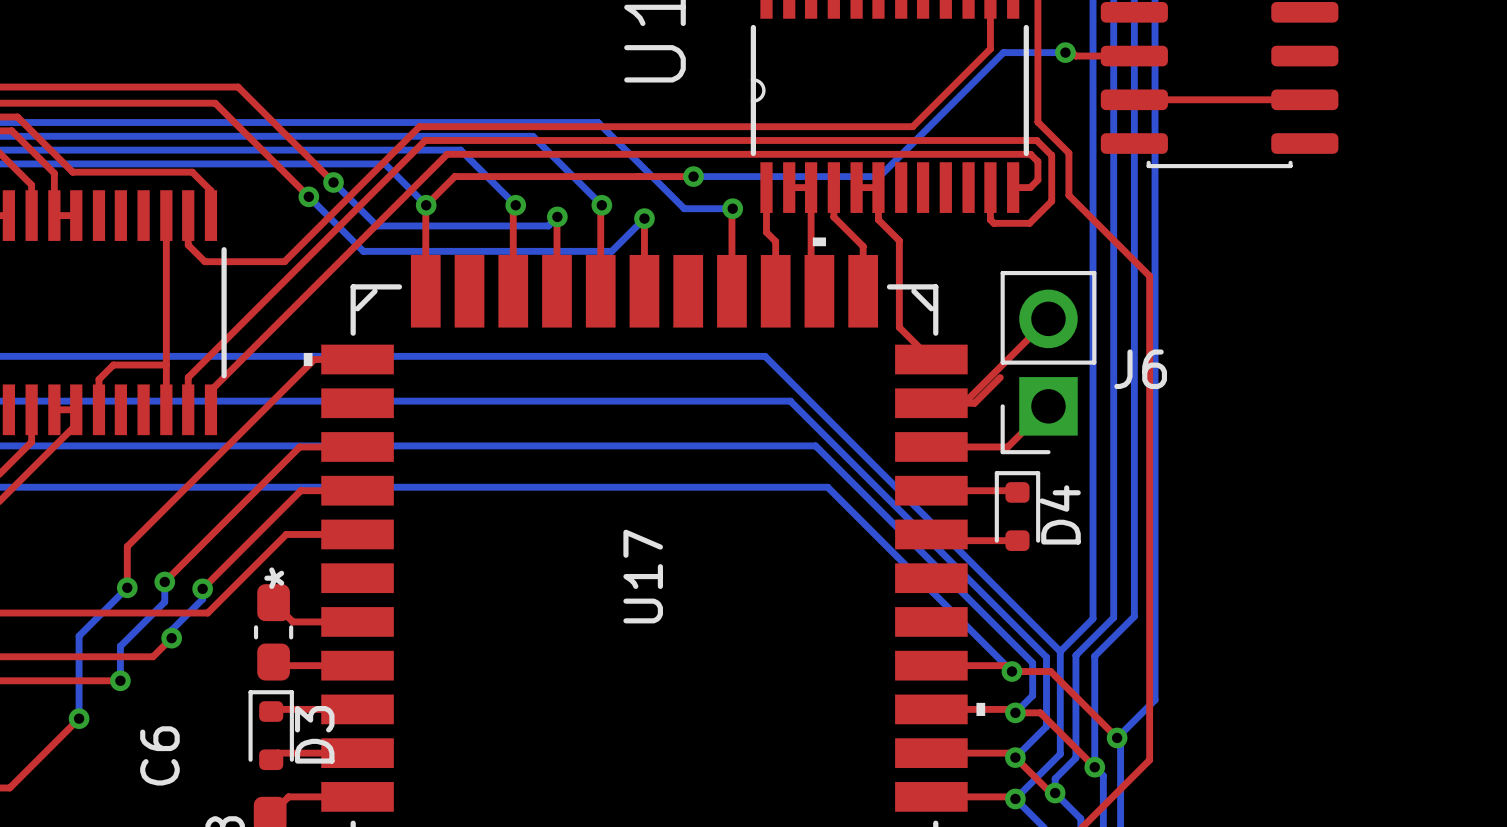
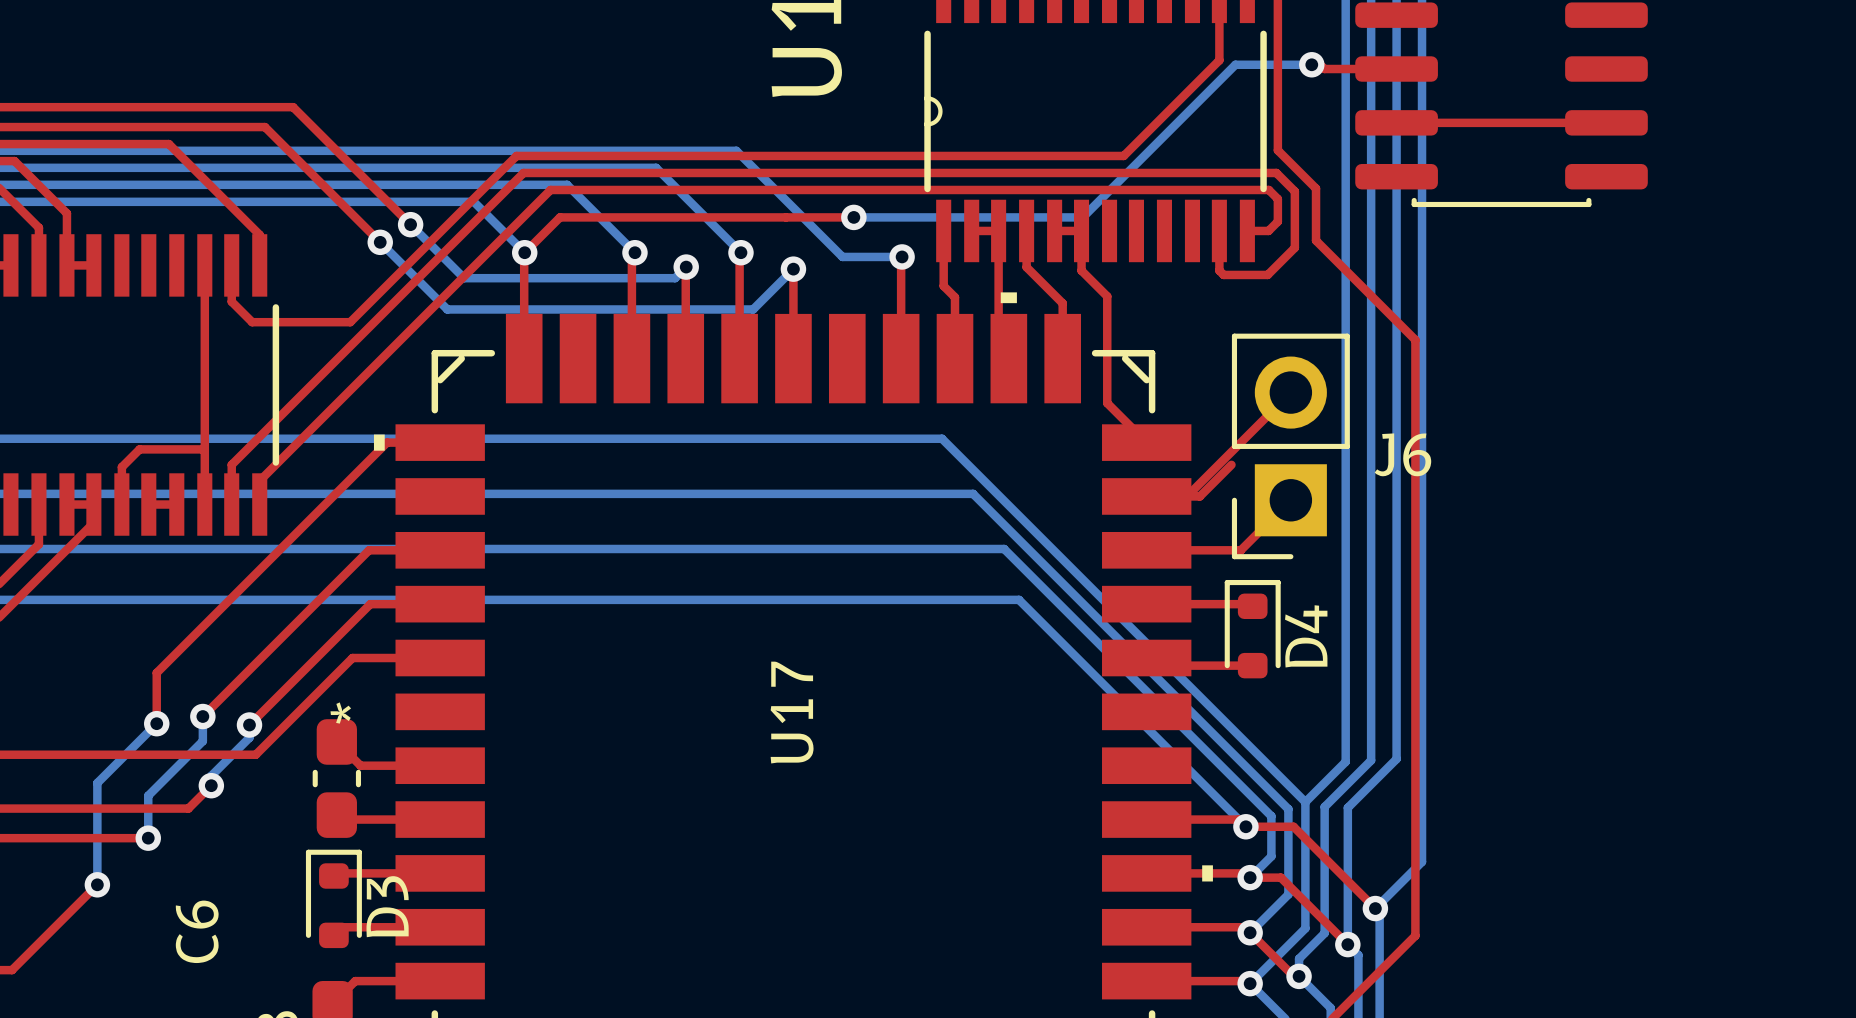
top track: (17, 117) (72, 172) (192, 172) -> (21, 144) (168, 144) (236, 211)
top track: none -> (148, 504) (176, 504)

